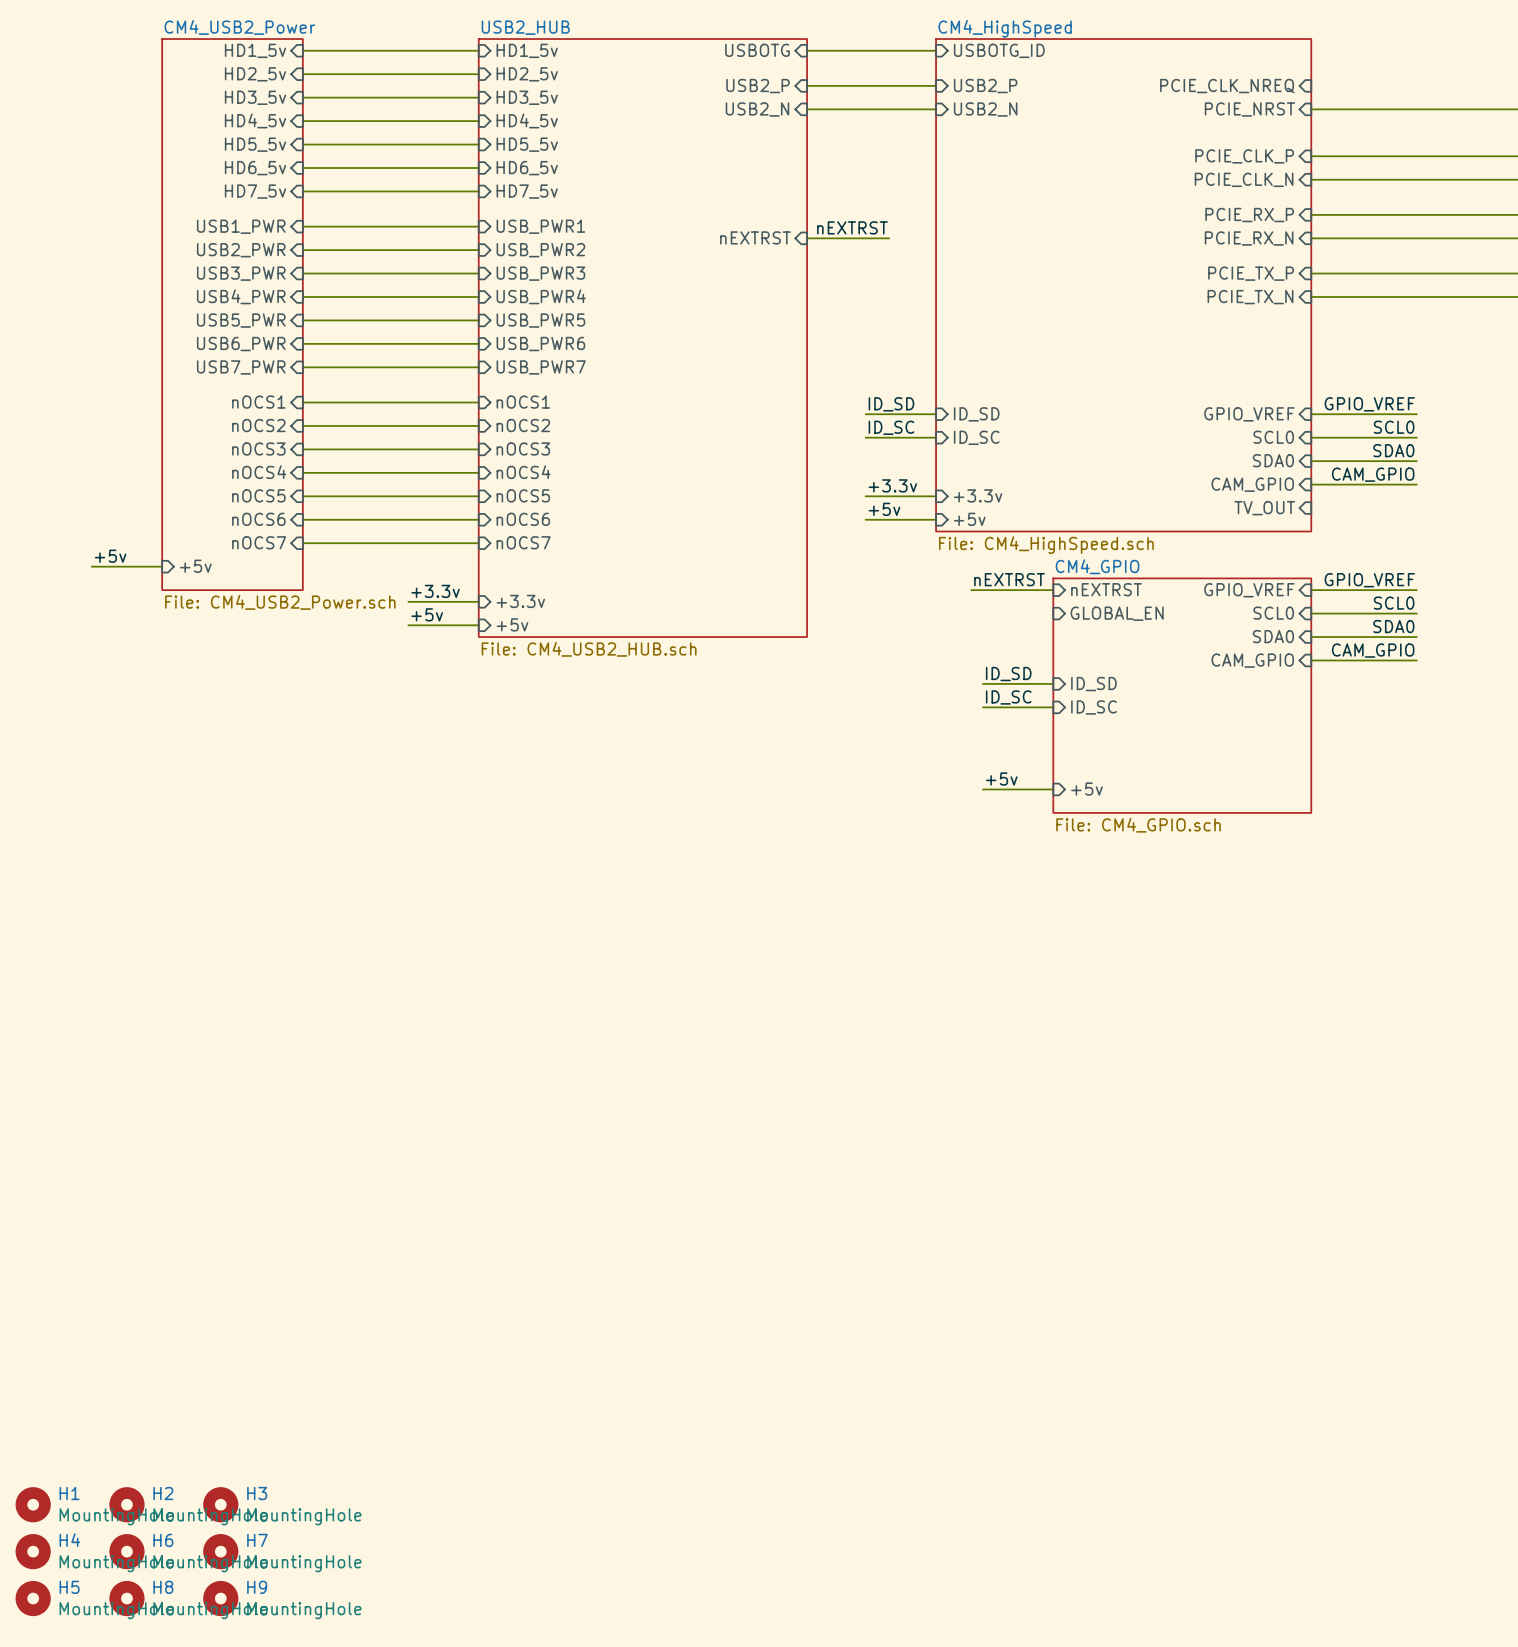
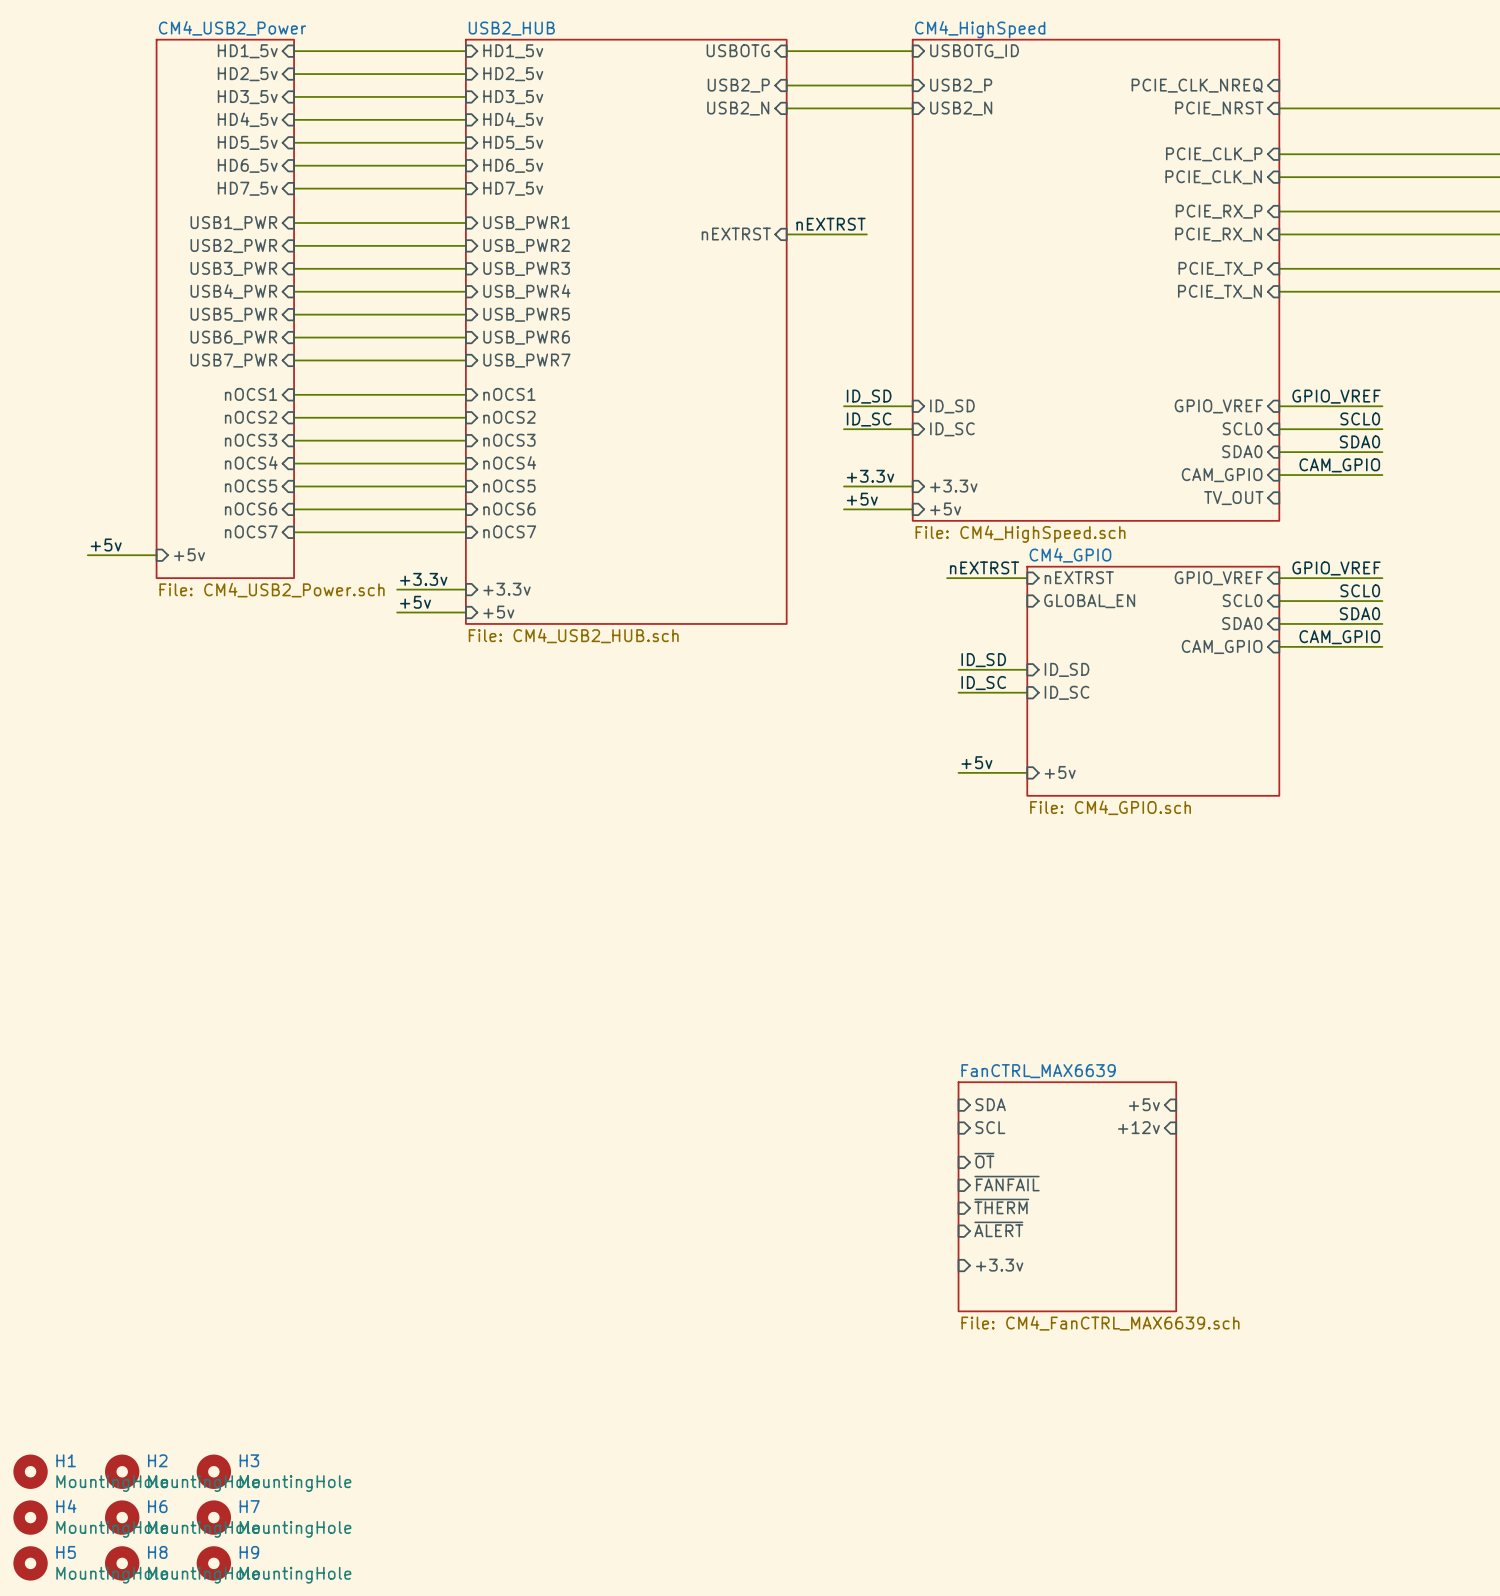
sheet pin: none -> SDA (990, 1104)
sheet pin: none -> +5v (1144, 1104)
sheet pin: none -> SCL (990, 1127)
sheet pin: none -> +12v (1138, 1127)
sheet pin: none -> ~{OT} (984, 1160)
sheet pin: none -> ~{FANFAIL} (1007, 1183)
sheet FanCTRL_MAX6639: none -> File: CM4_FanCTRL_MAX6639.sch (1067, 1196)
sheet pin: none -> ~{THERM} (1001, 1206)
sheet pin: none -> ~{ALERT} (998, 1229)
sheet pin: none -> +3.3v (999, 1265)

